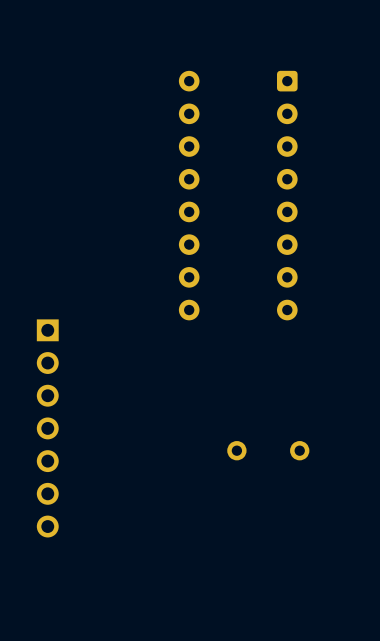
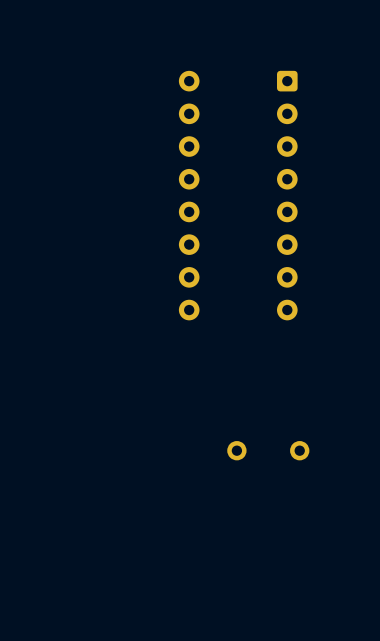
part: (47, 428) -> none

